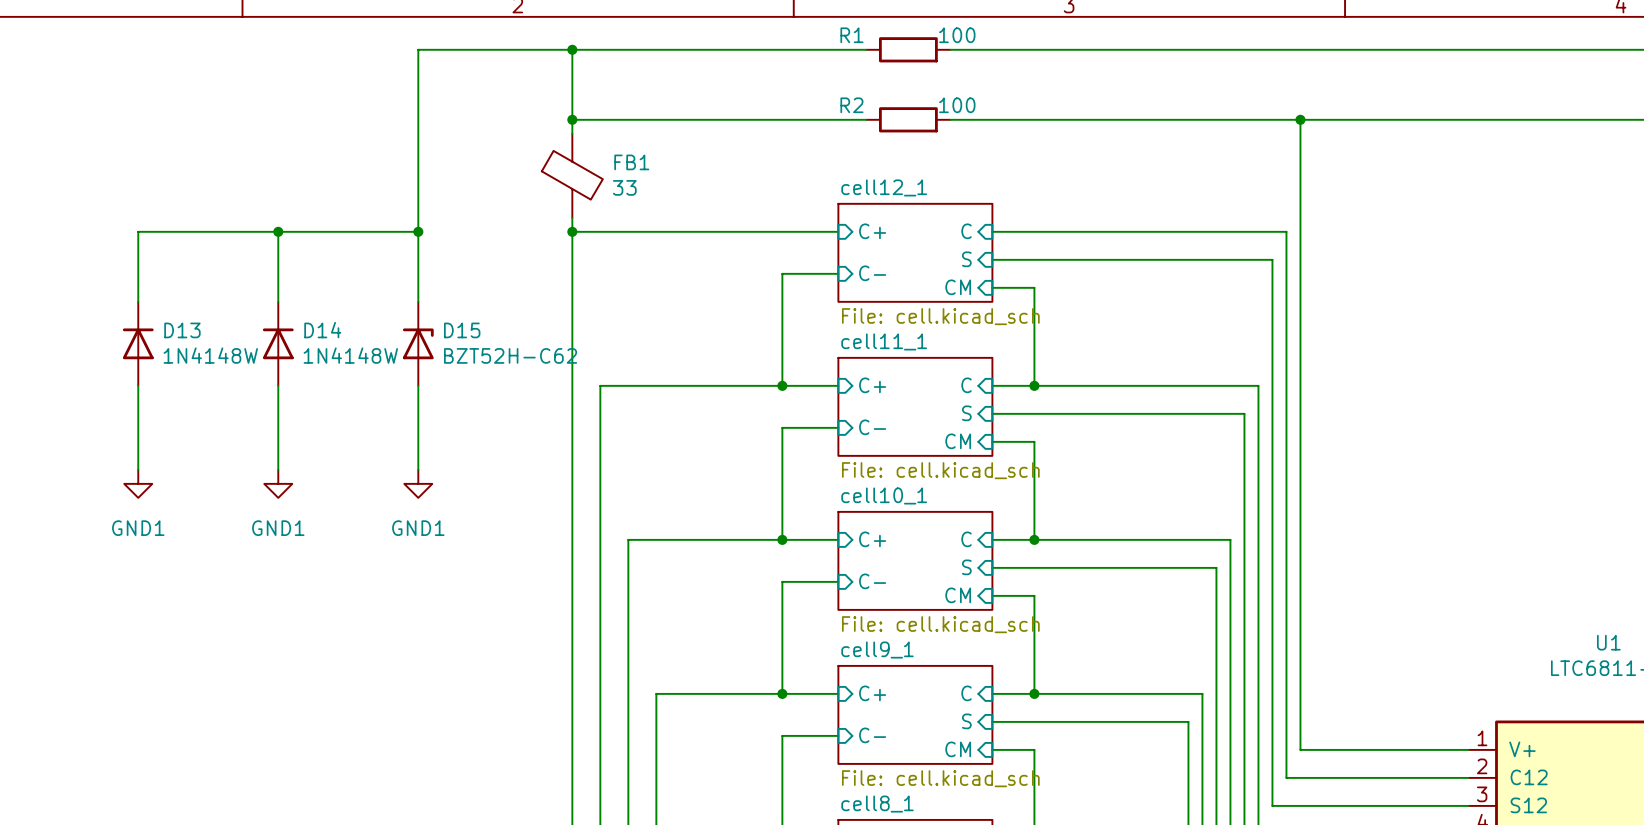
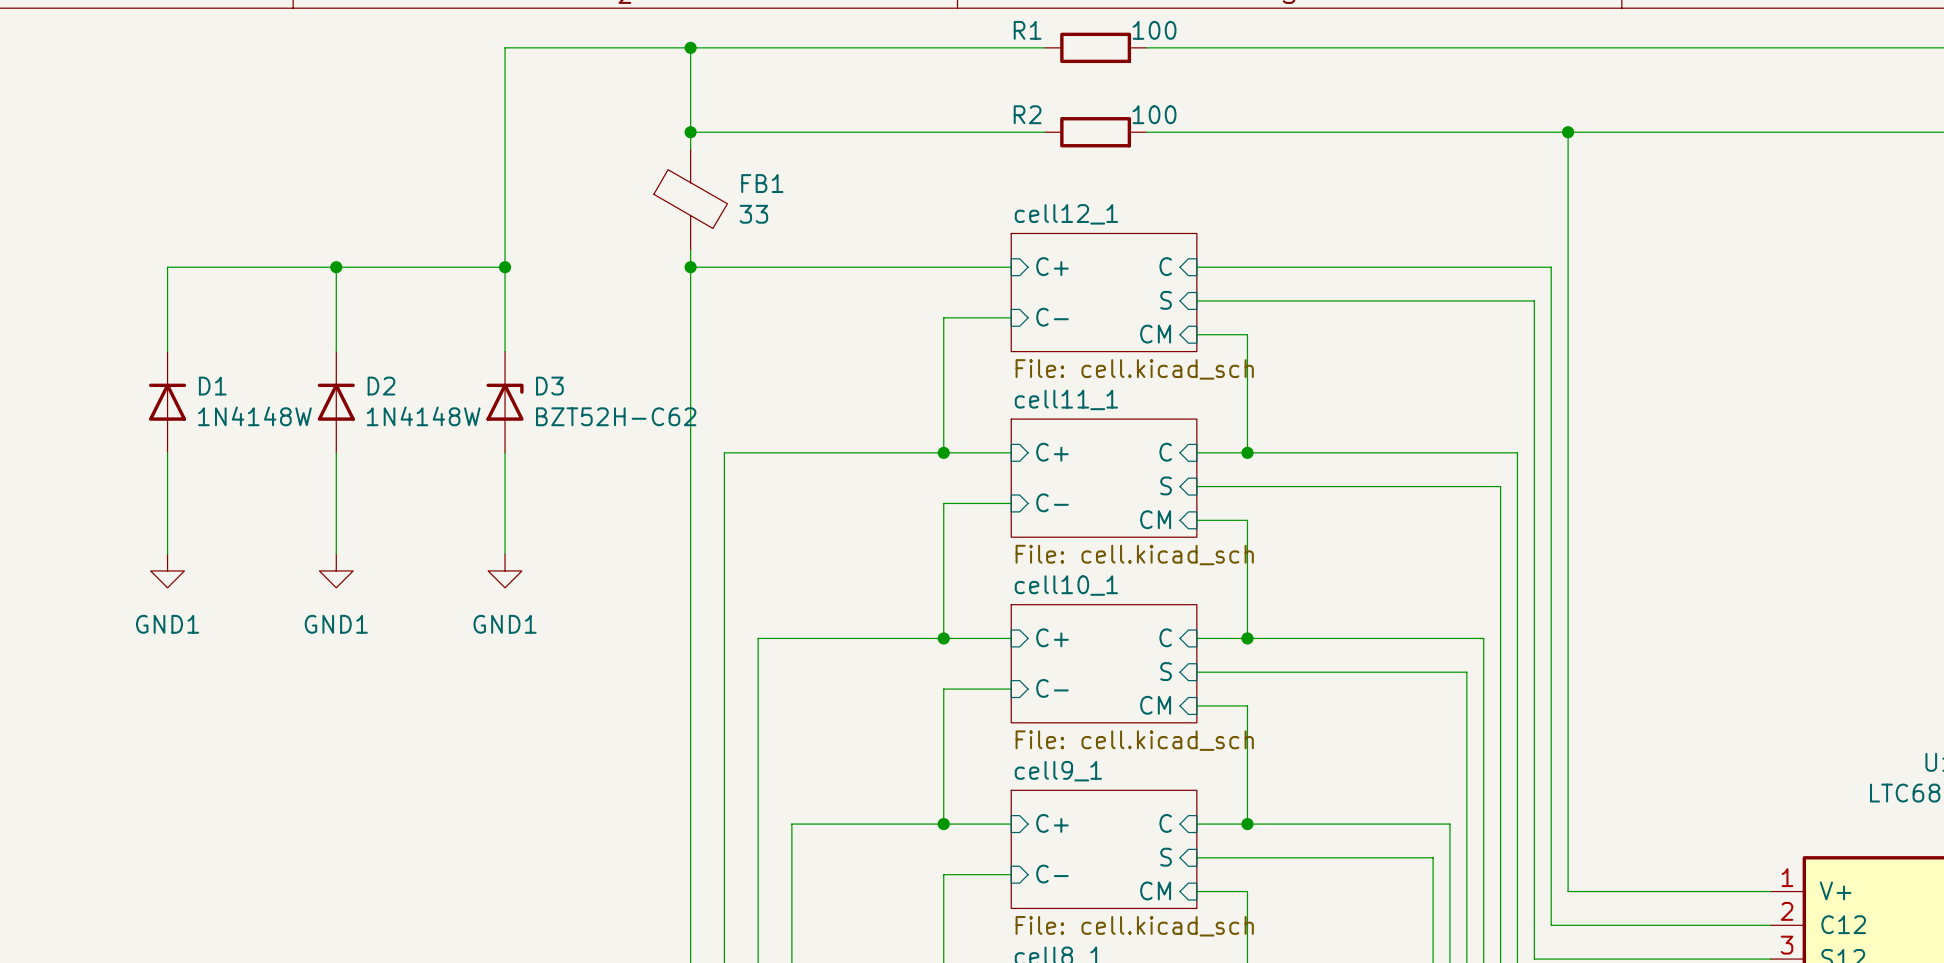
D13 name: D13 (182, 330) -> D1 (212, 386)
D14 name: D14 (322, 330) -> D2 (381, 386)
D15 name: D15 (462, 330) -> D3 (549, 386)

